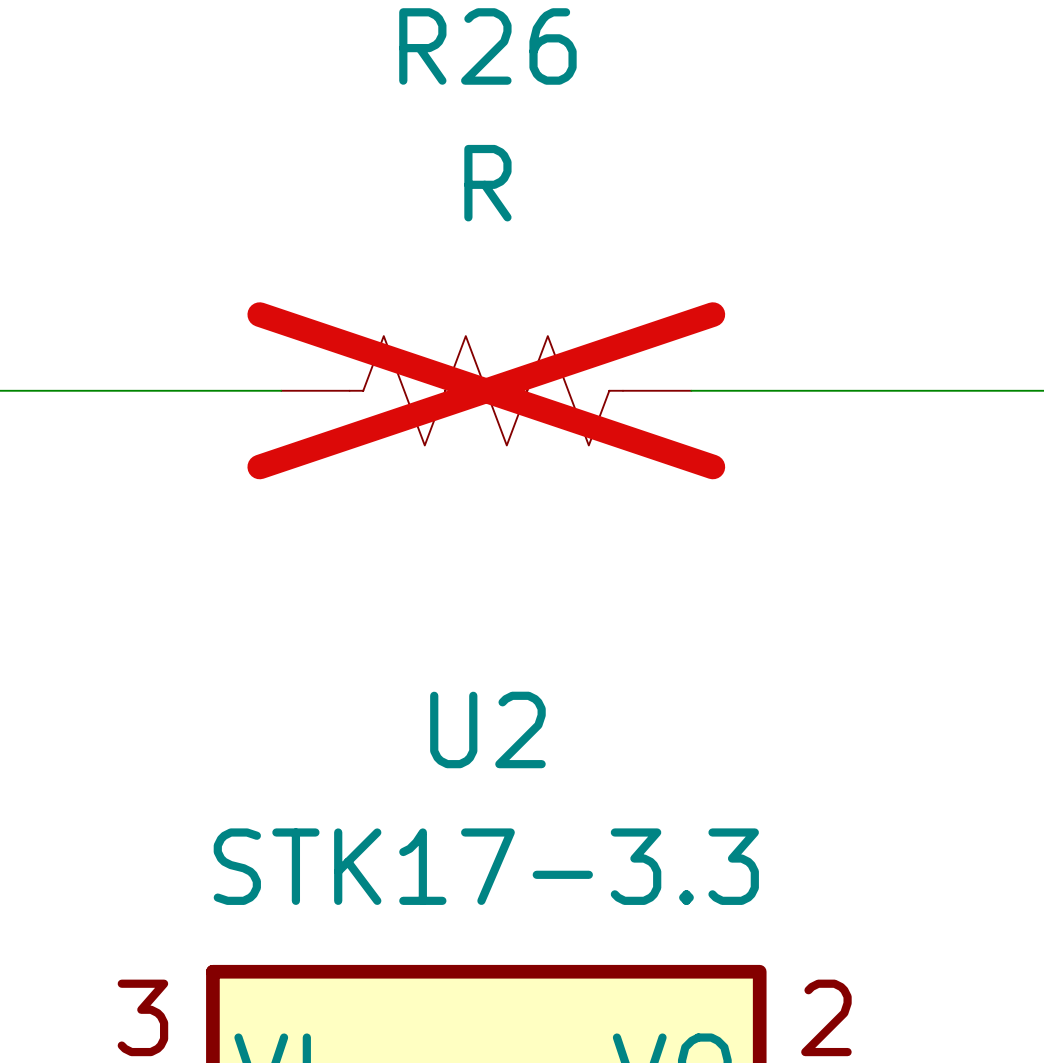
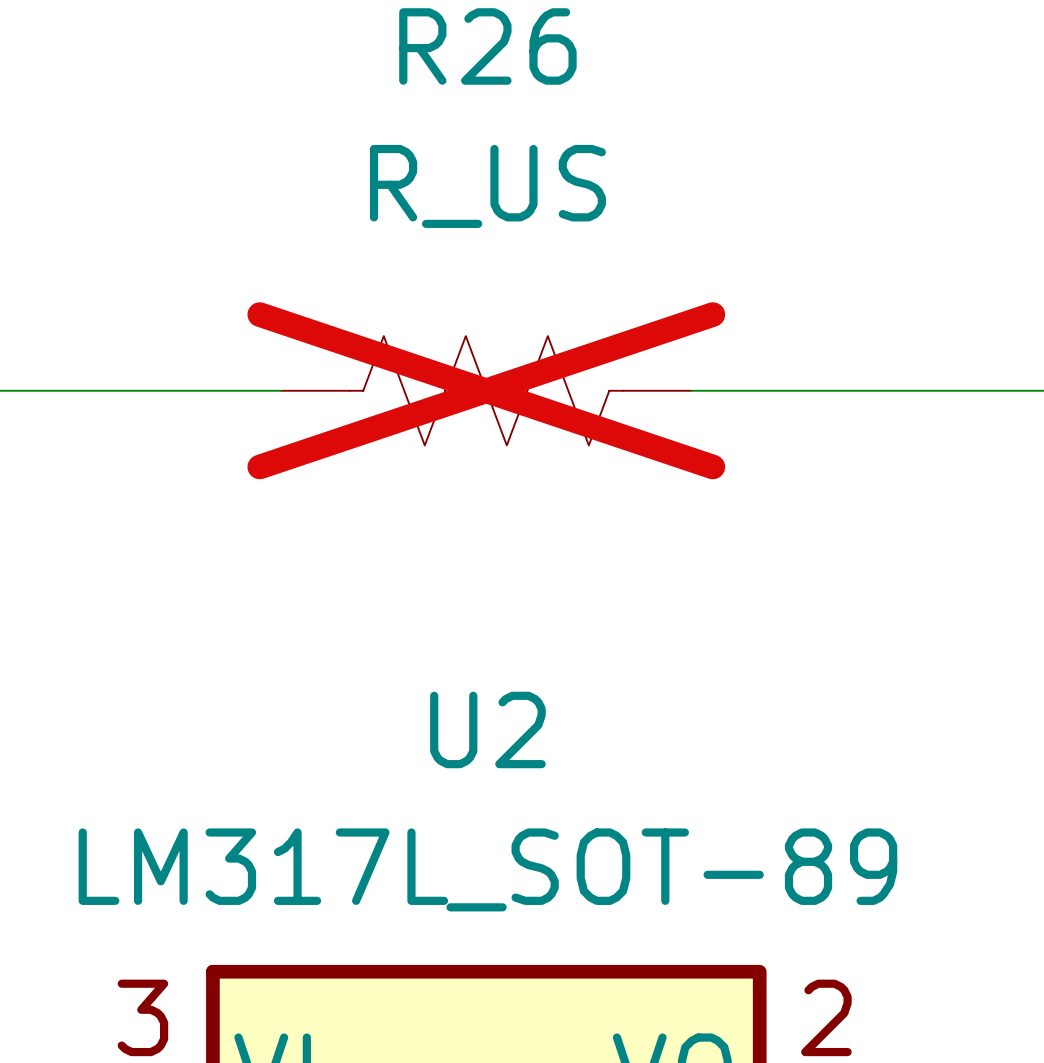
R26 value: R (487, 183) -> R_US (487, 186)
U2 value: STK17-3.3 (486, 866) -> LM317L_SOT-89 (487, 869)

